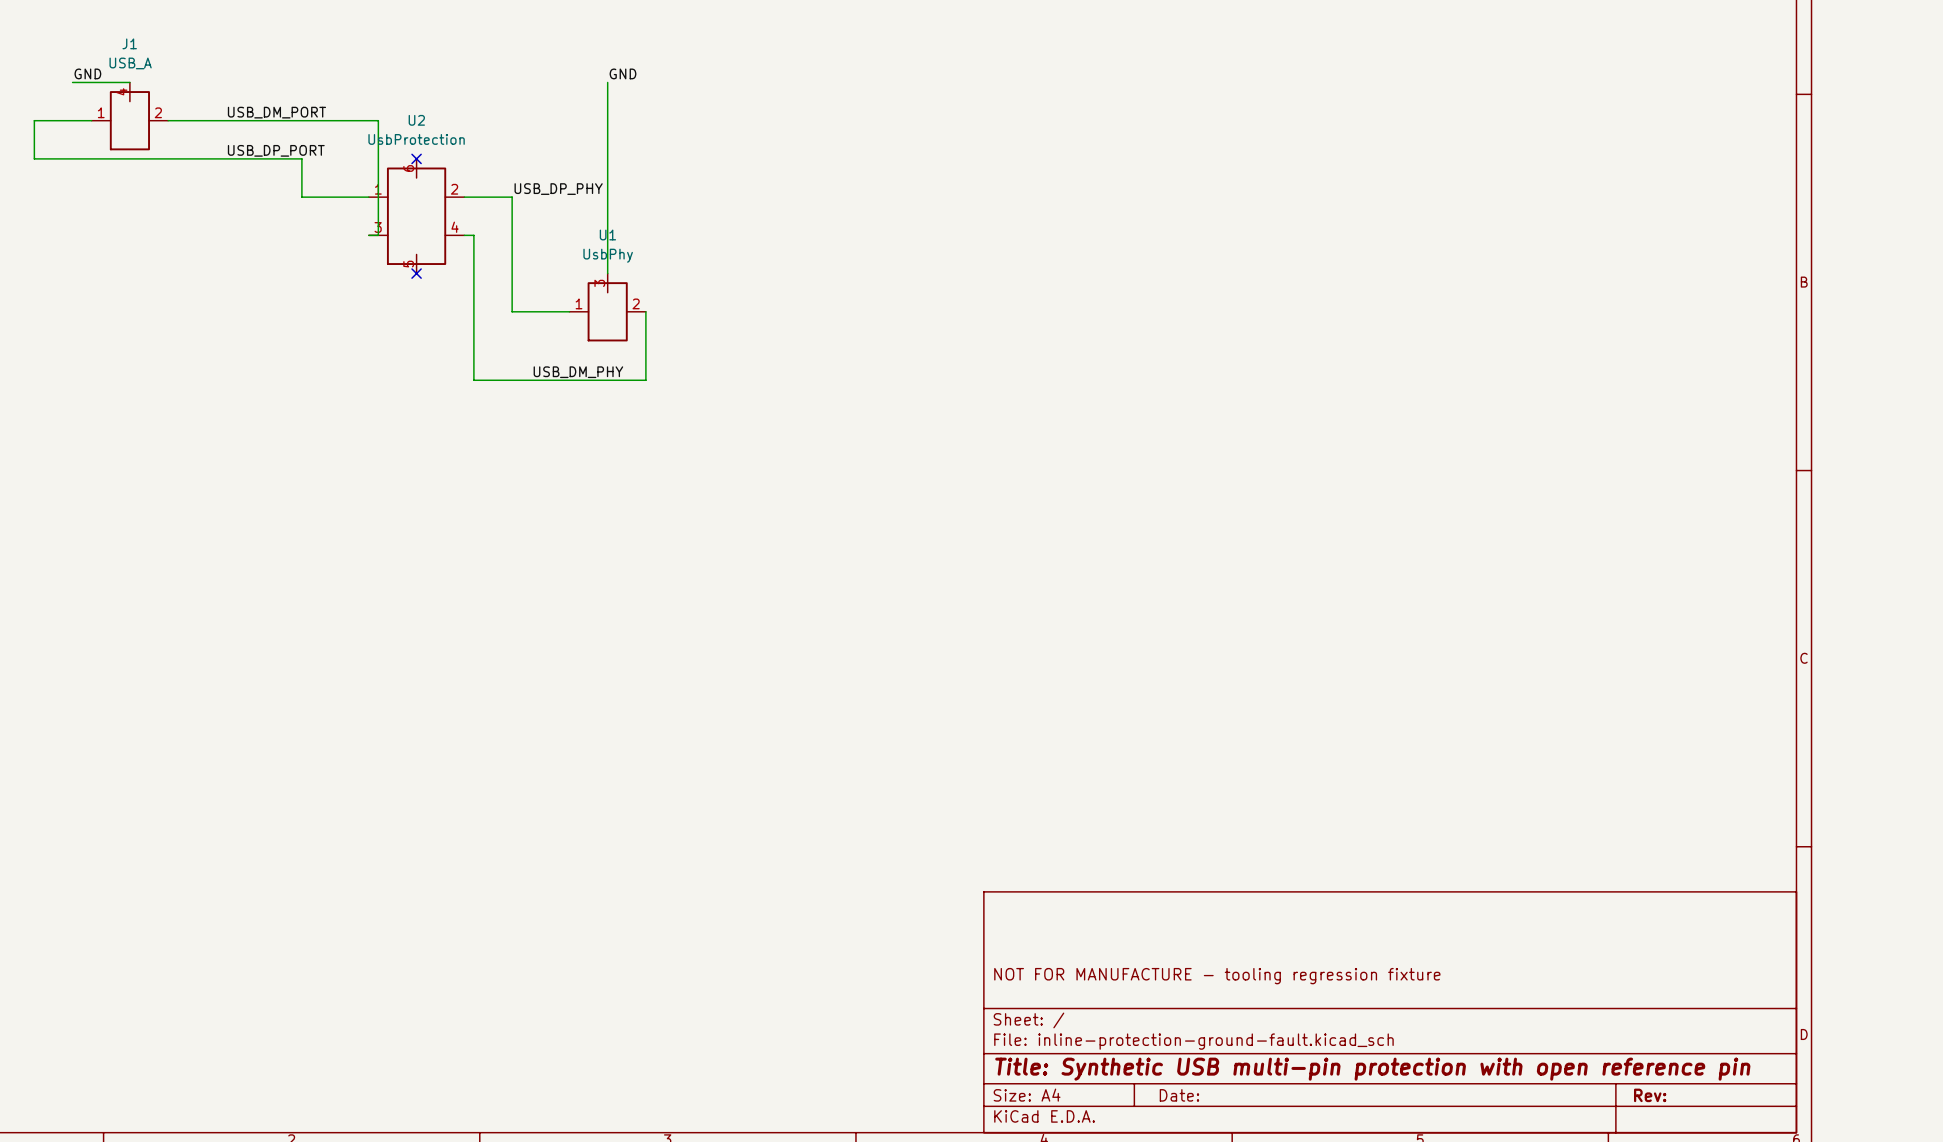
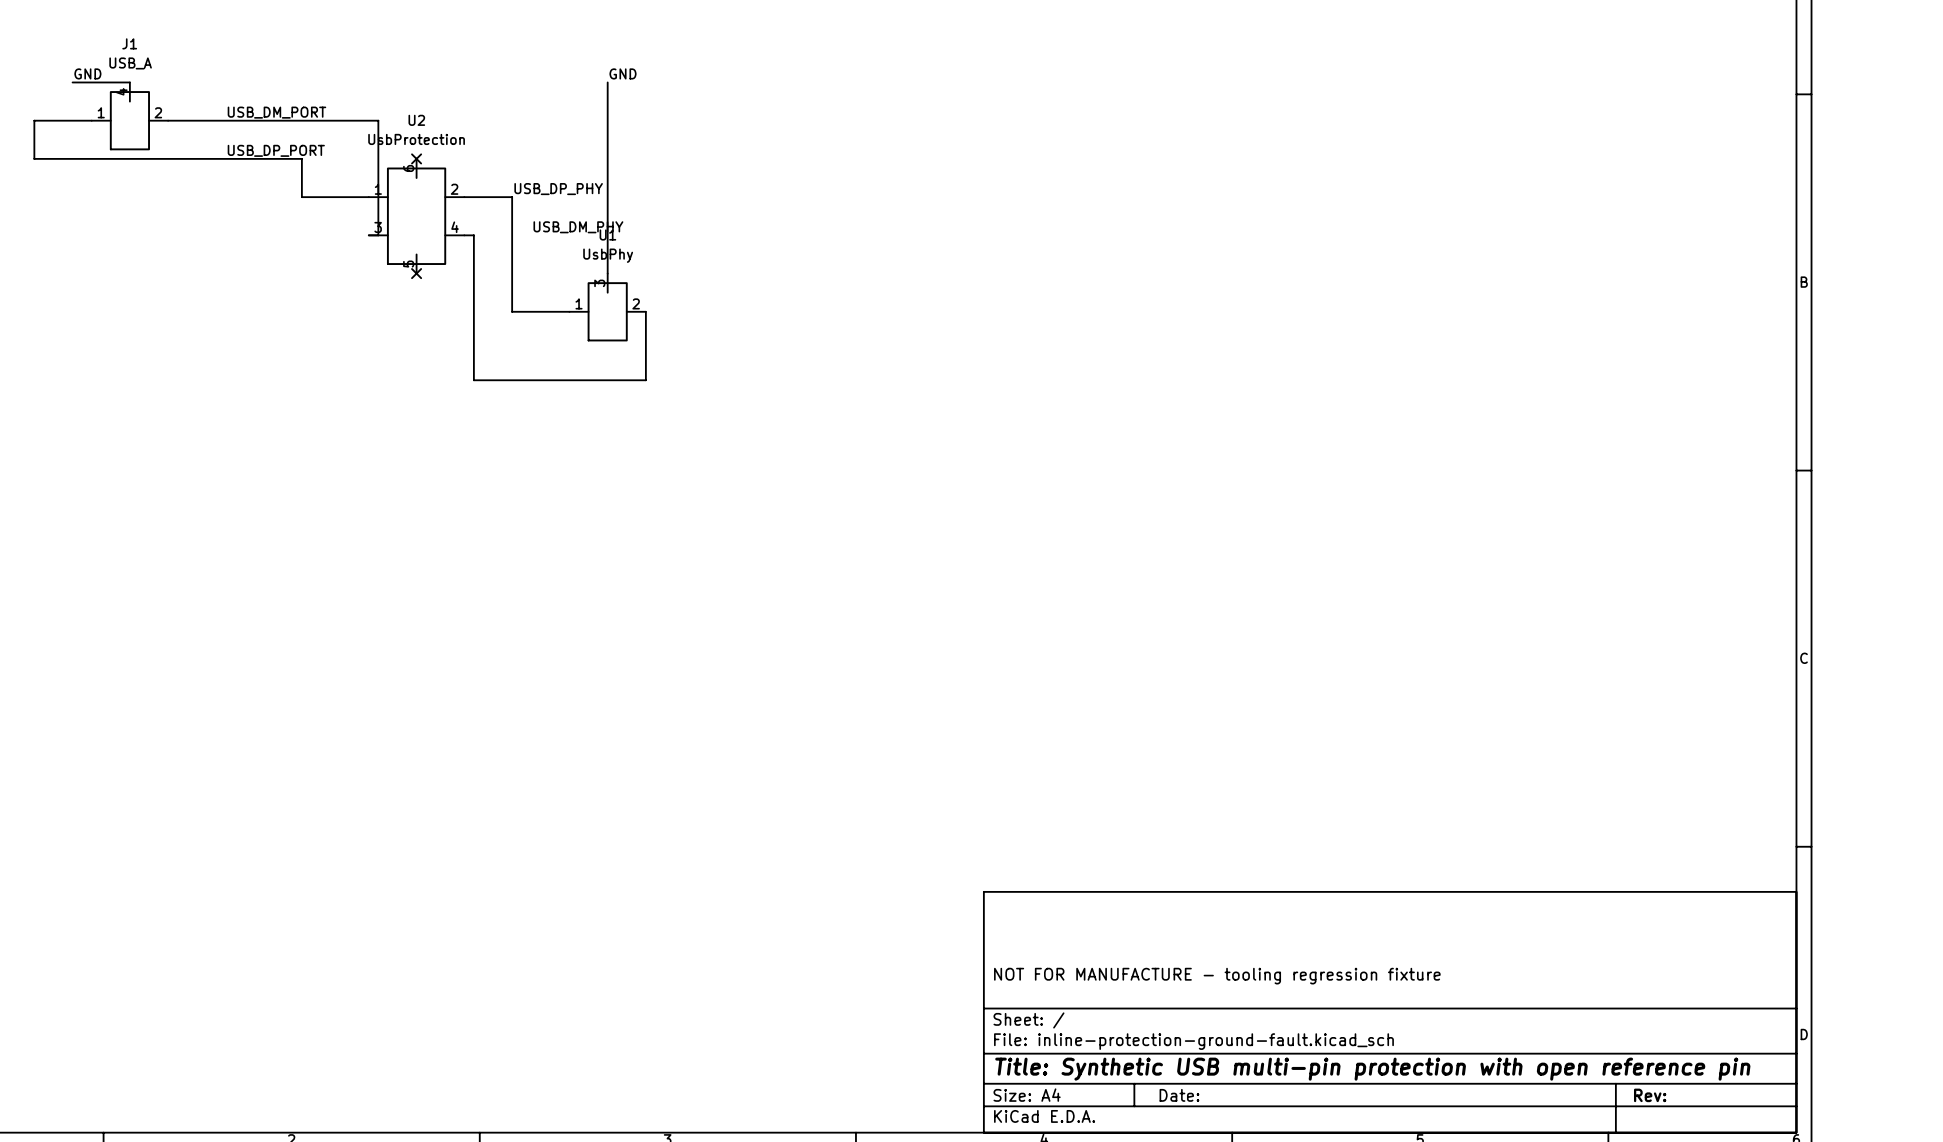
label position: USB_DM_PHY (578, 372) -> USB_DM_PHY (578, 227)

